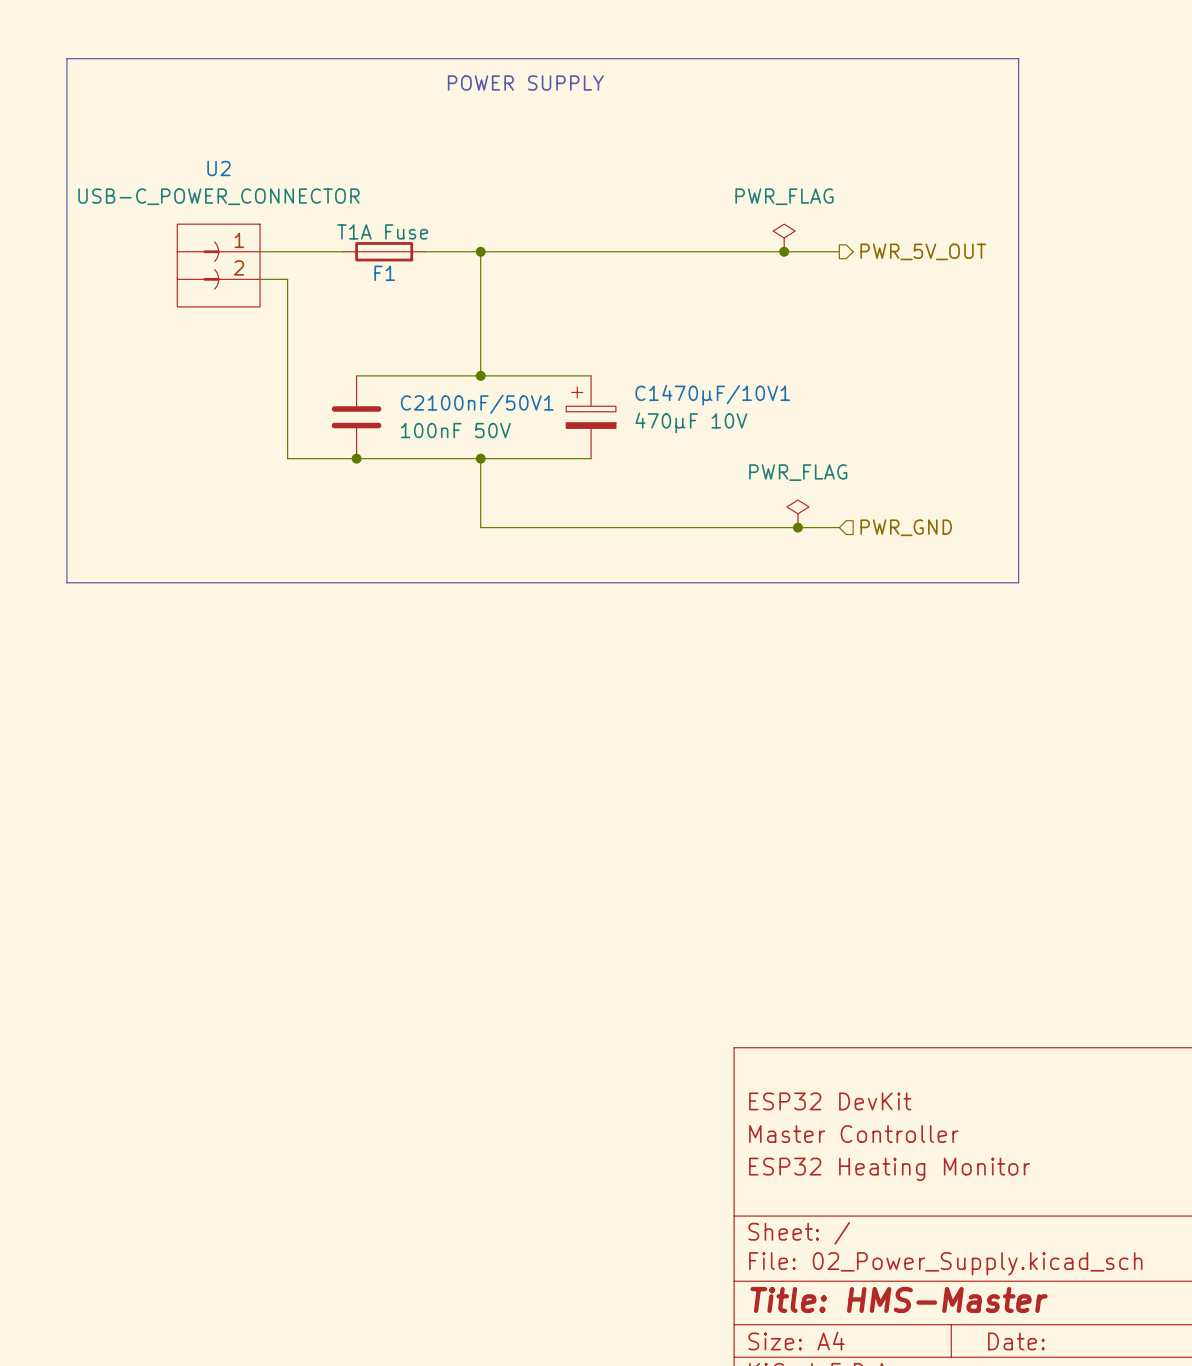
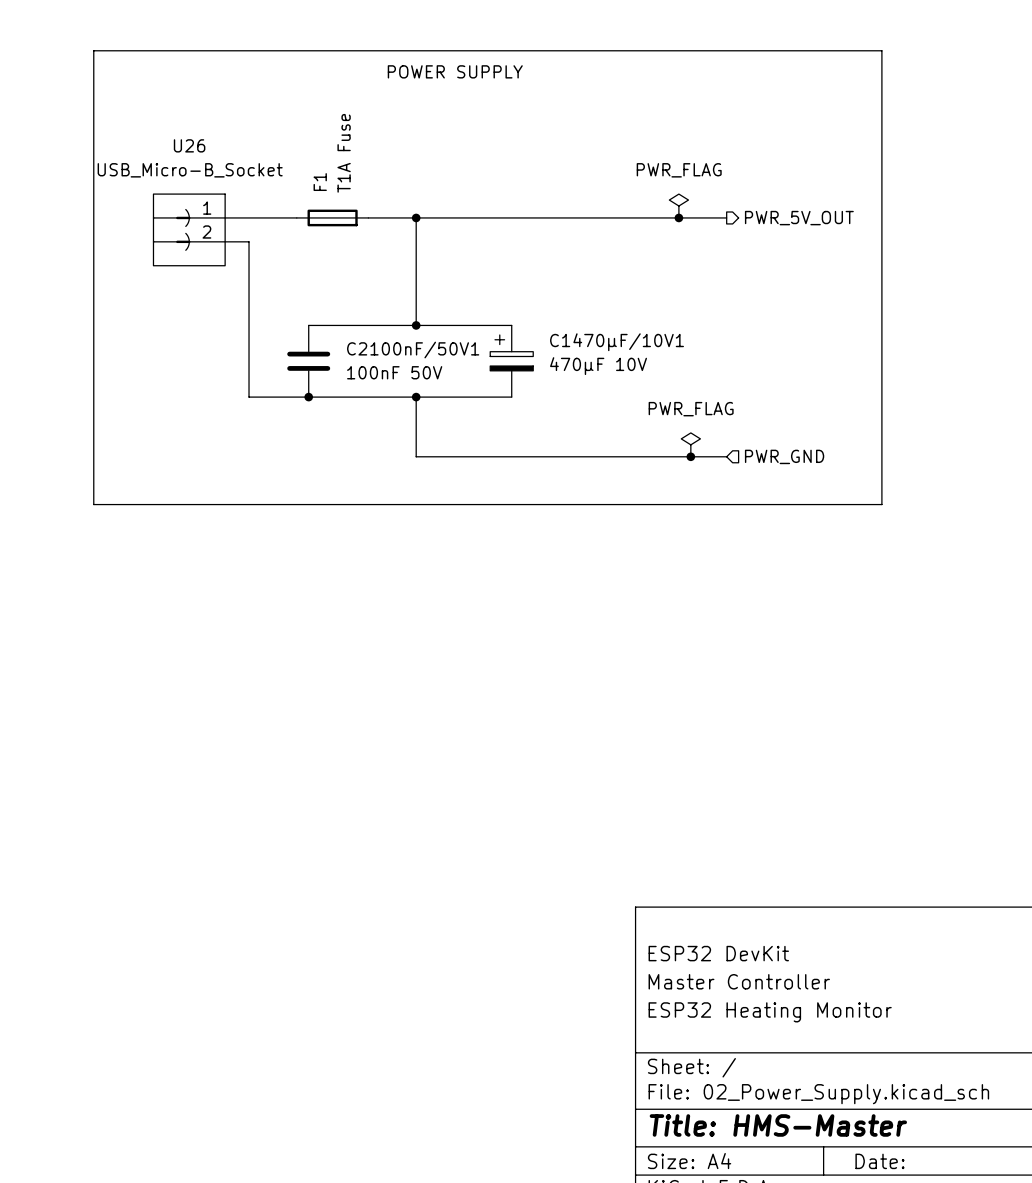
line: (108, 58) (66, 58) (66, 582) (108, 582) -> (93, 50) (93, 504)
U2 name: U2 (218, 168) -> U26 (189, 145)
U2 value: USB-C_POWER_CONNECTOR (218, 196) -> USB_Micro-B_Socket (190, 170)
F1 value rotation: 0° (382, 231) -> 90° counterclockwise (344, 153)
F1 name rotation: 0° (384, 273) -> 90° counterclockwise (320, 182)
F1 name position: F1 (384, 273) -> F1 (320, 182)

